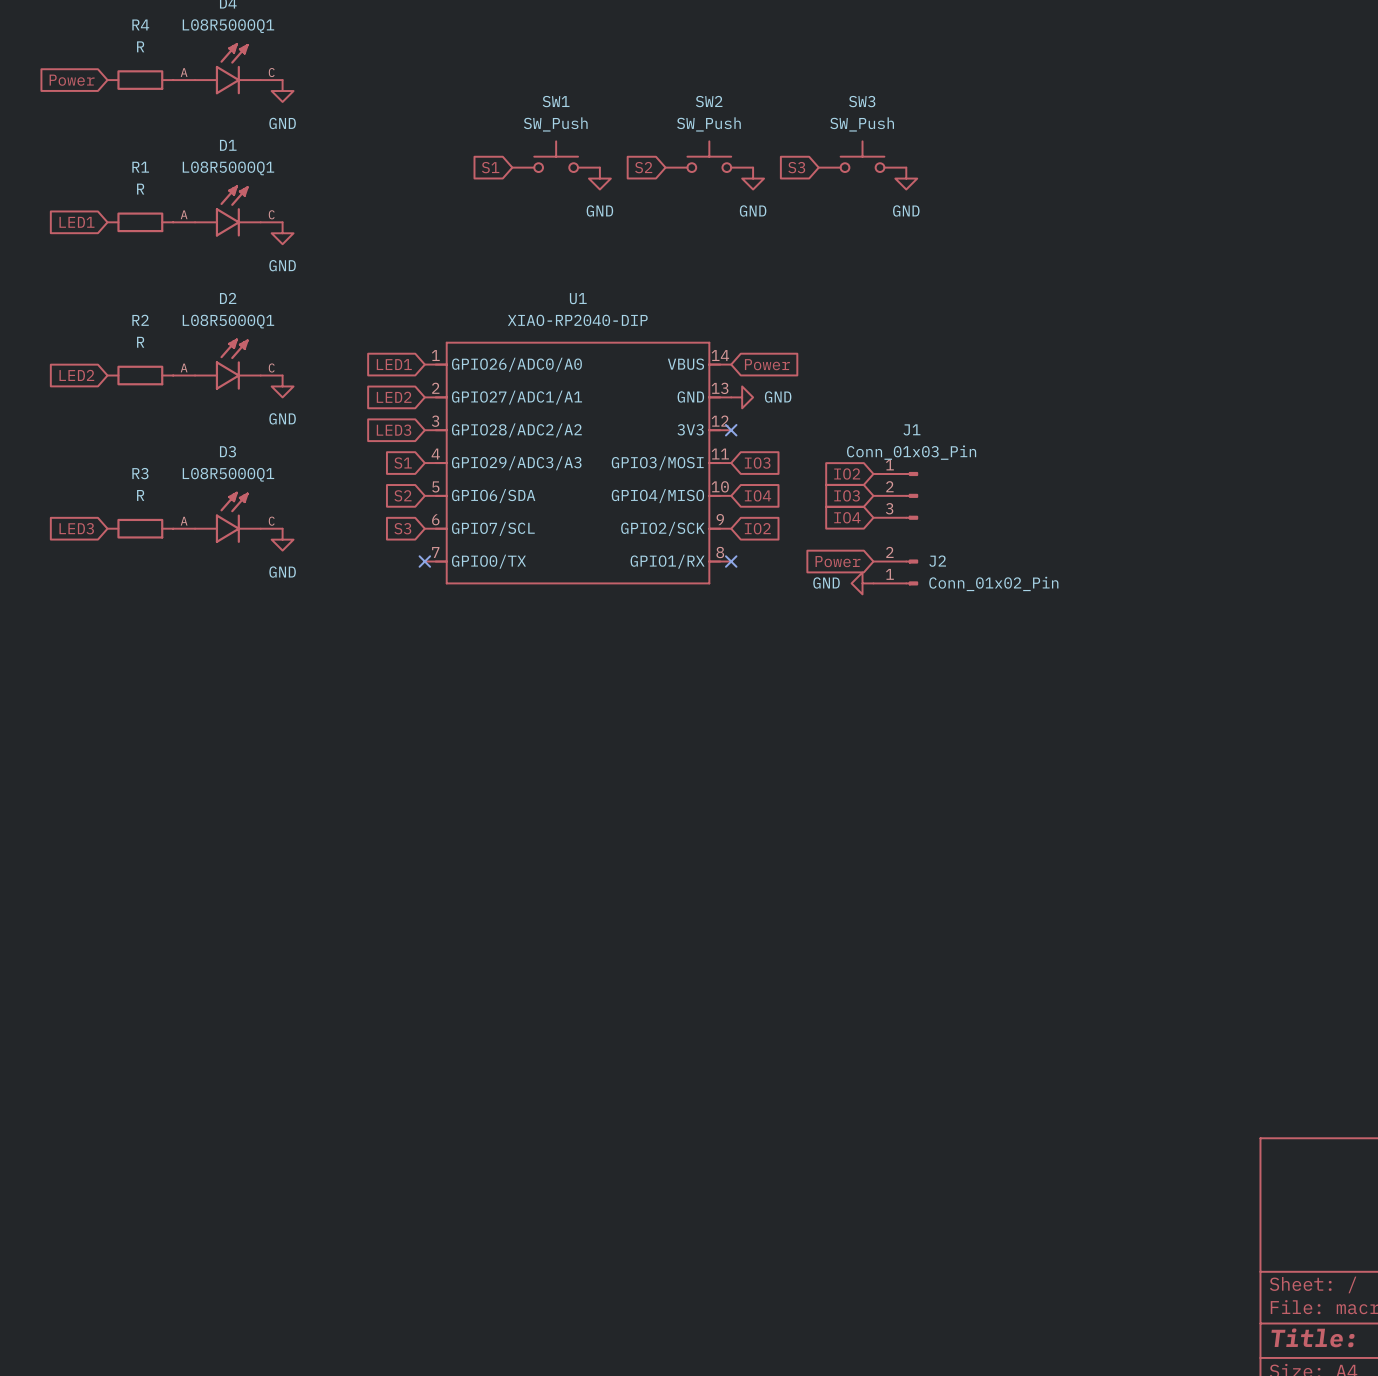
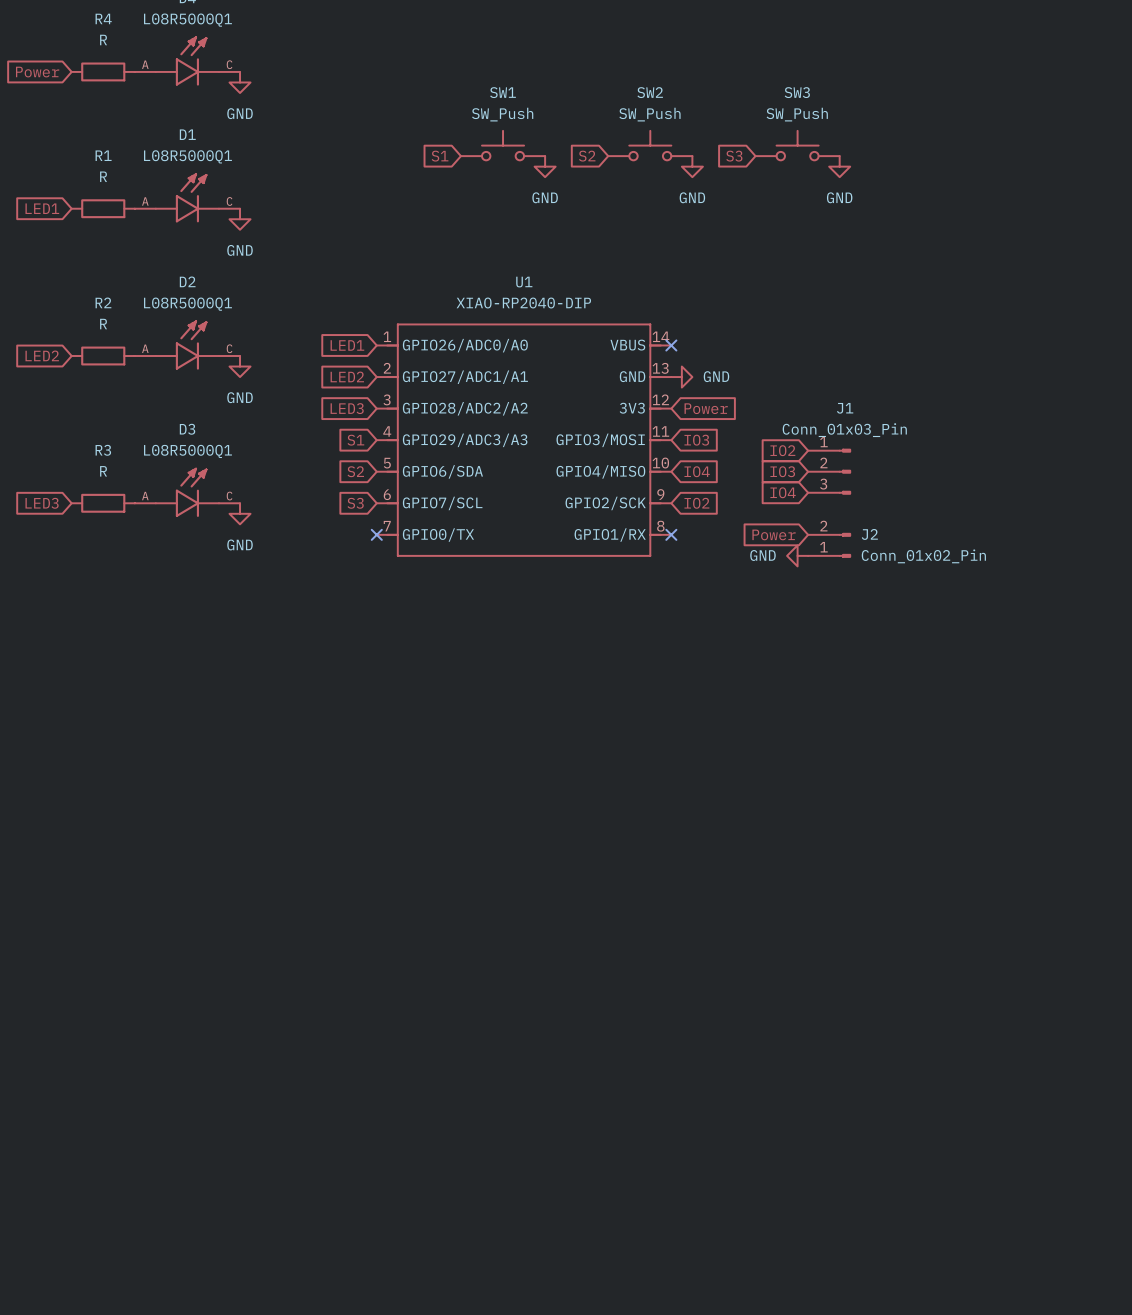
no-connect mark: none -> (671, 345)
global label position: Power (767, 364) -> Power (706, 408)
no-connect mark: (731, 430) -> none

